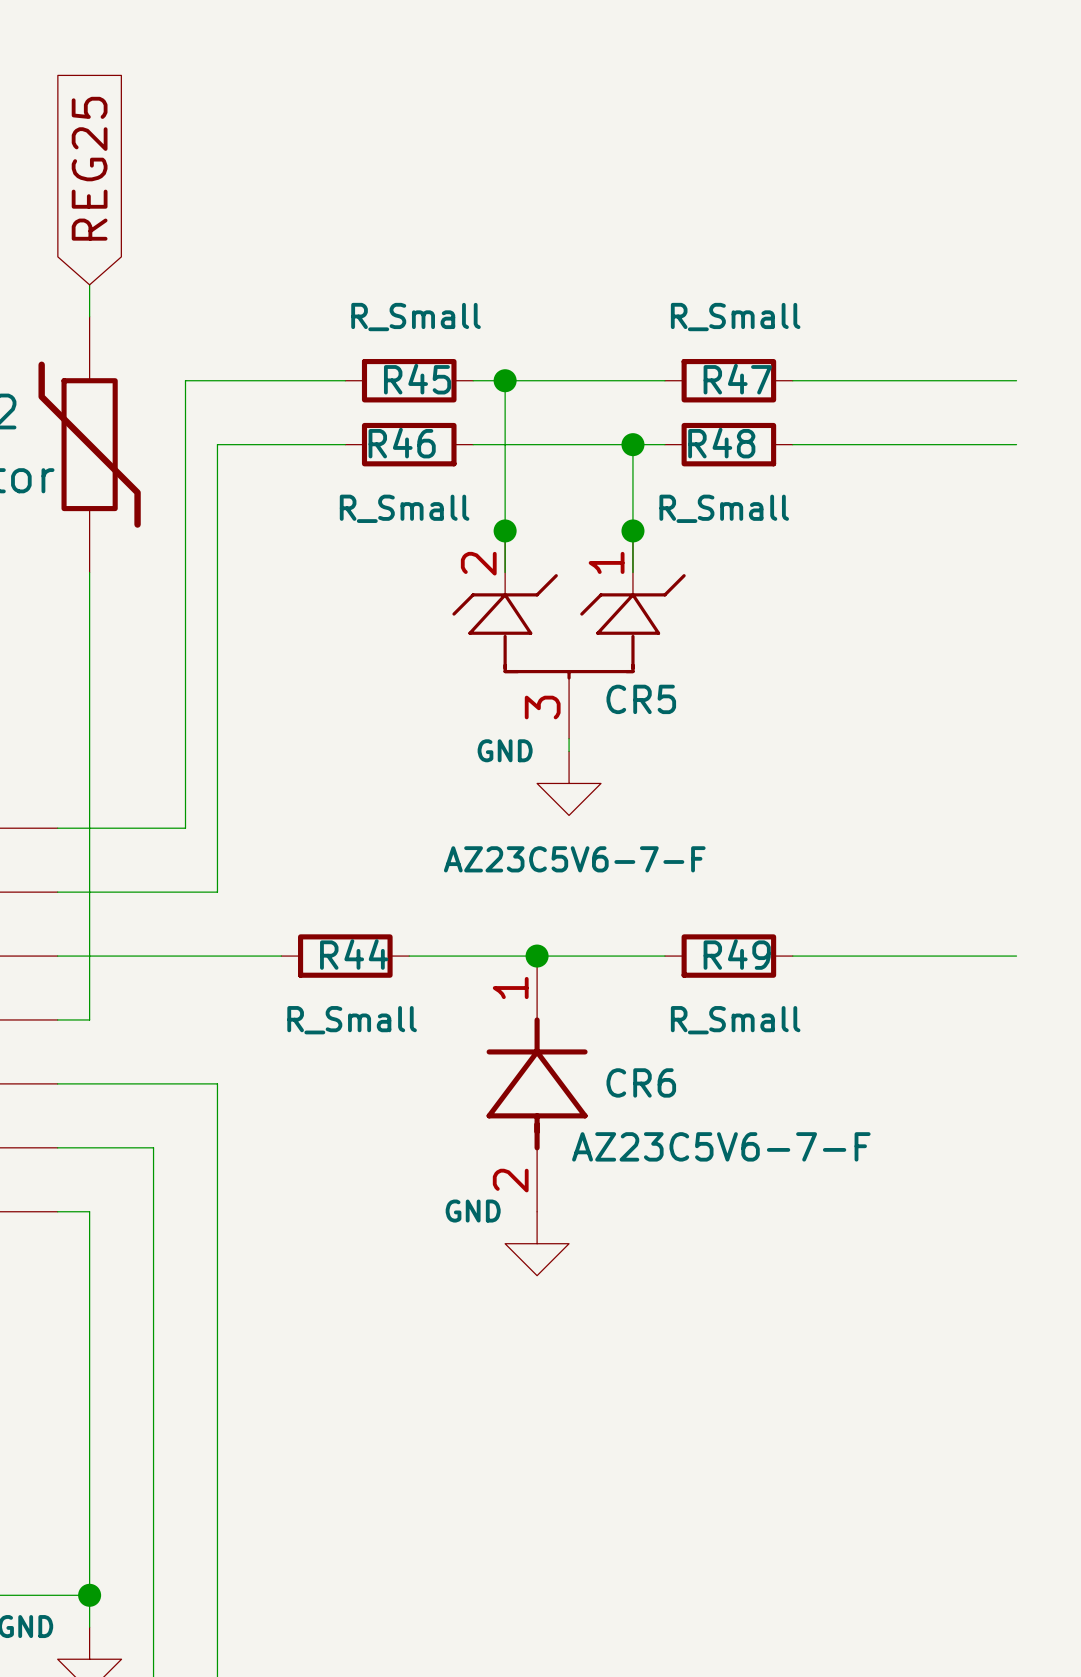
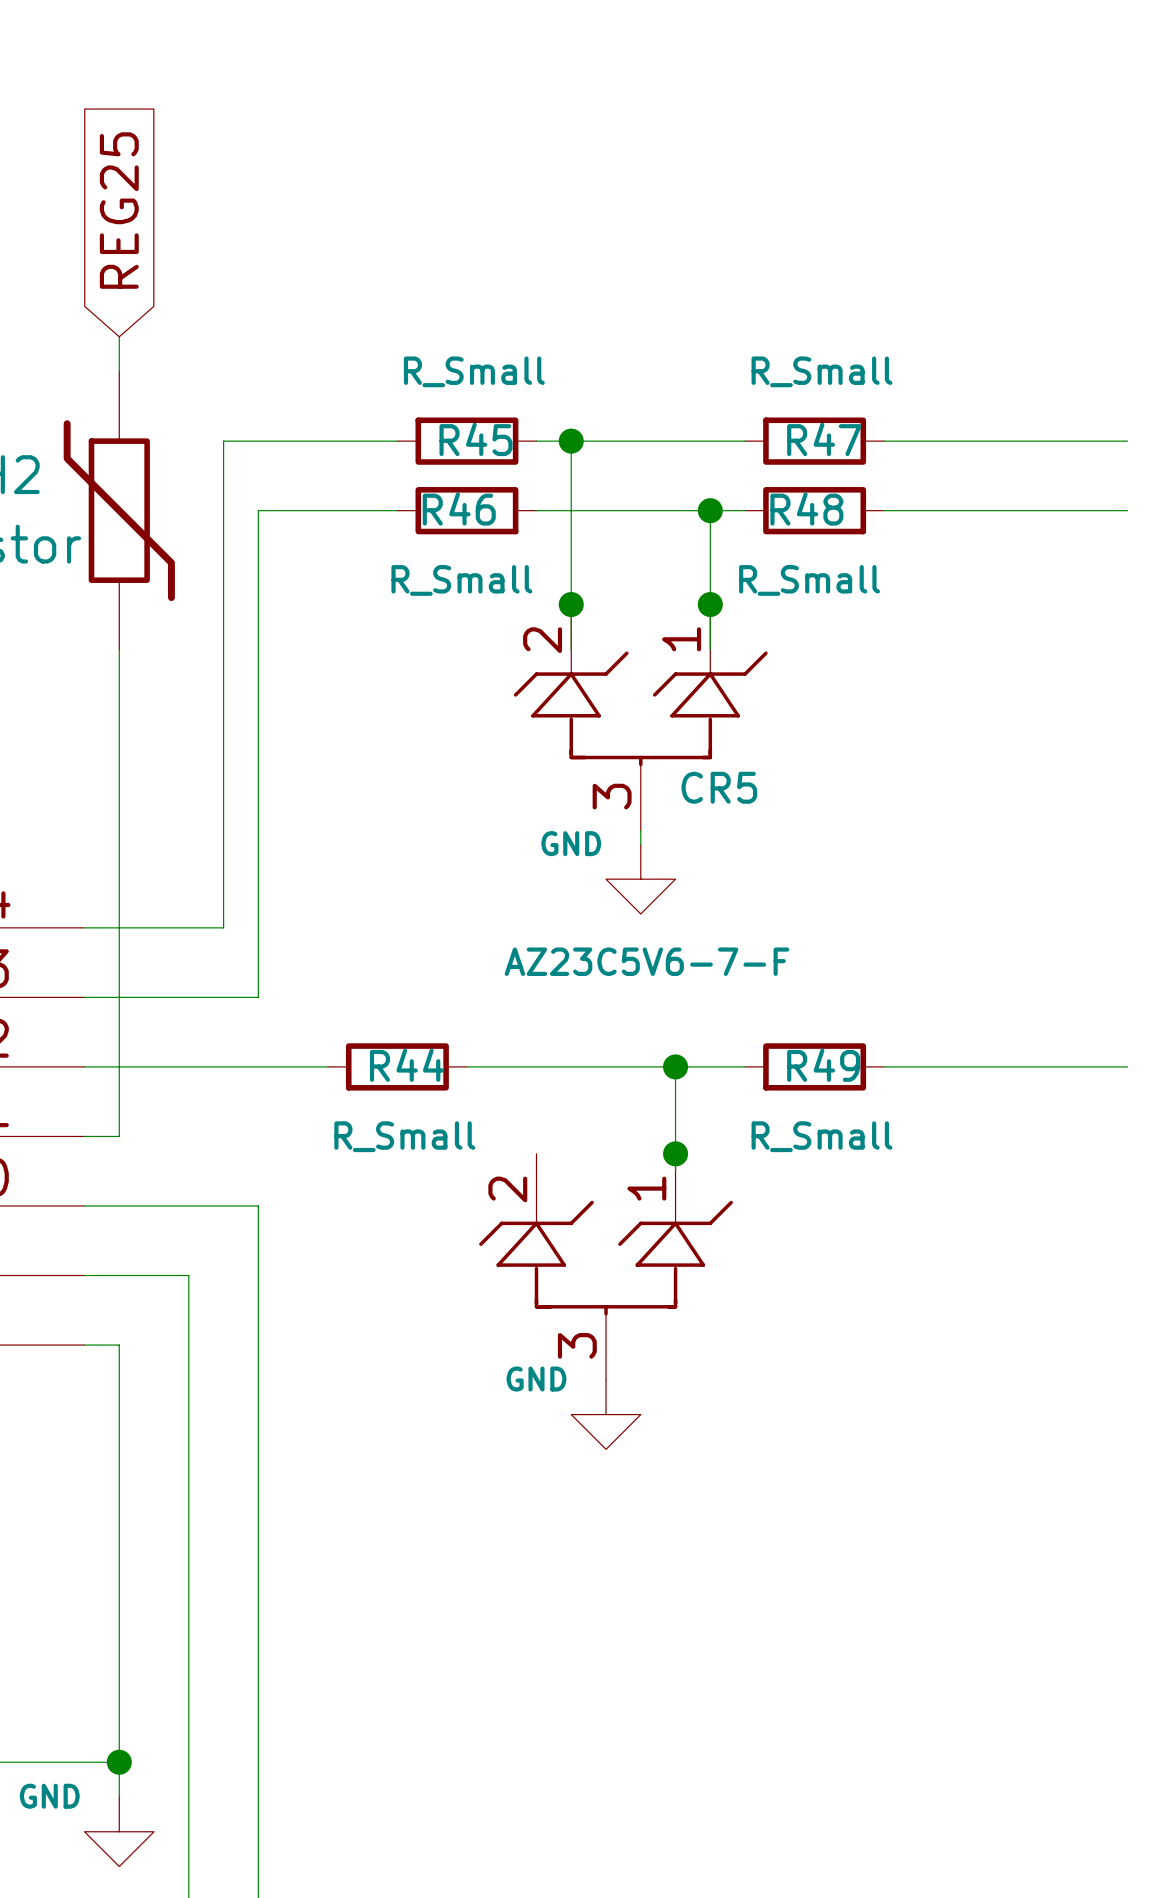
junction: (537, 956) -> none
wire: none -> (675, 1066) (675, 1171)
junction: none -> (675, 1066)
junction: none -> (675, 1153)
CR6: AZ23C5V6-7-F (537, 1083) -> none
part: none -> (606, 1266)
power symbol position: GND (537, 1243) -> GND (606, 1414)

